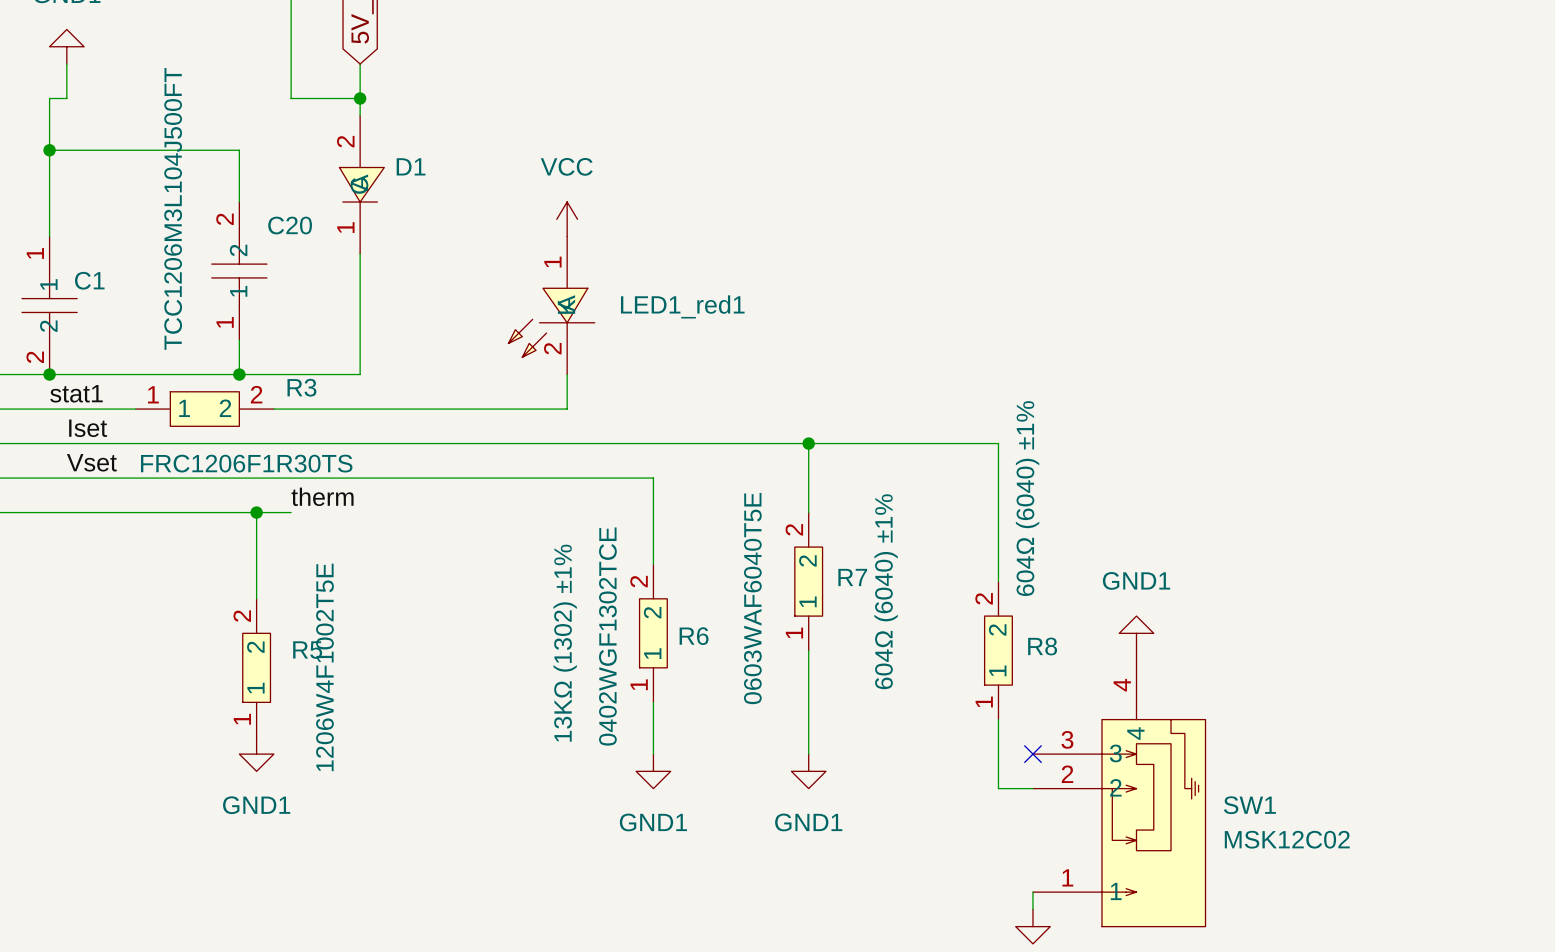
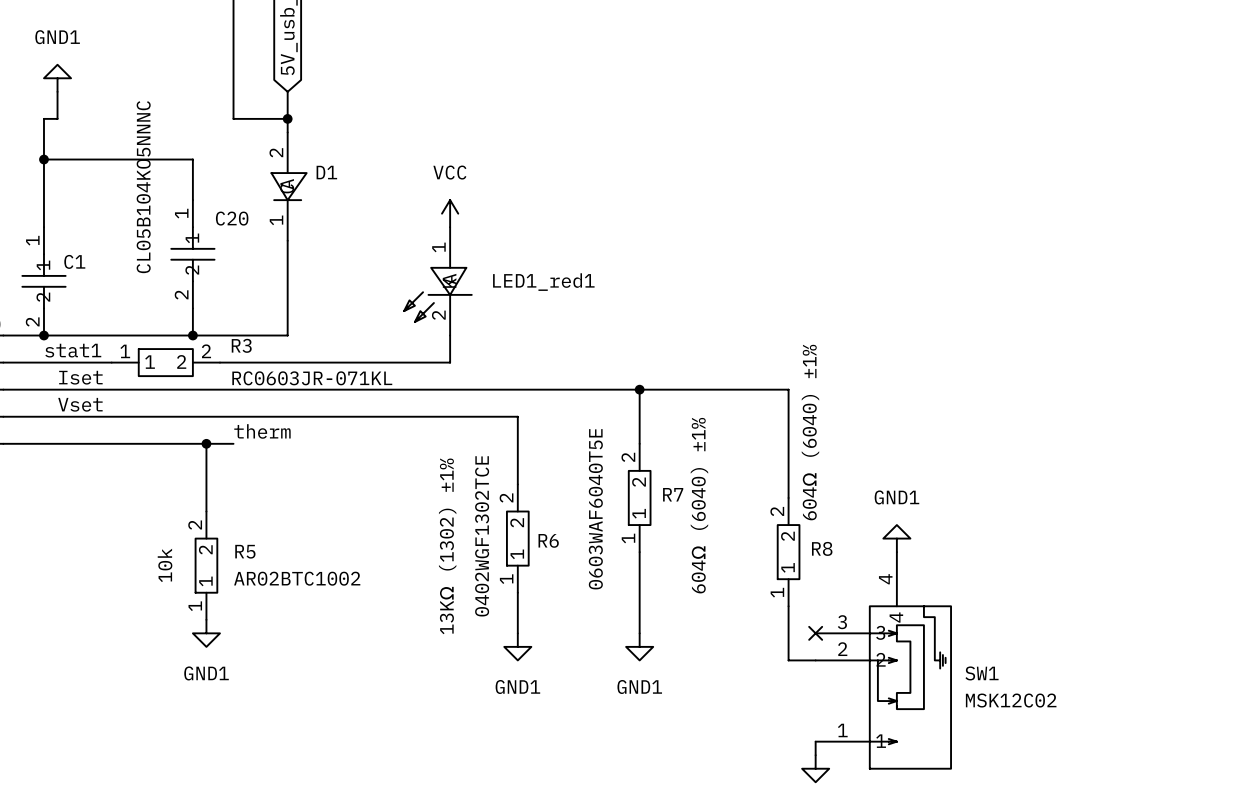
C20 value: TCC1206M3L104J500FT (173, 208) -> CL05B104KO5NNNC (143, 187)
C20 rotation: 0° (239, 271) -> 180° (192, 254)
R3 value: FRC1206F1R30TS (246, 463) -> RC0603JR-071KL (312, 378)
R5 text: none -> 10k (165, 565)
R5 value: 1206W4F1002T5E (324, 667) -> AR02BTC1002 (297, 578)

